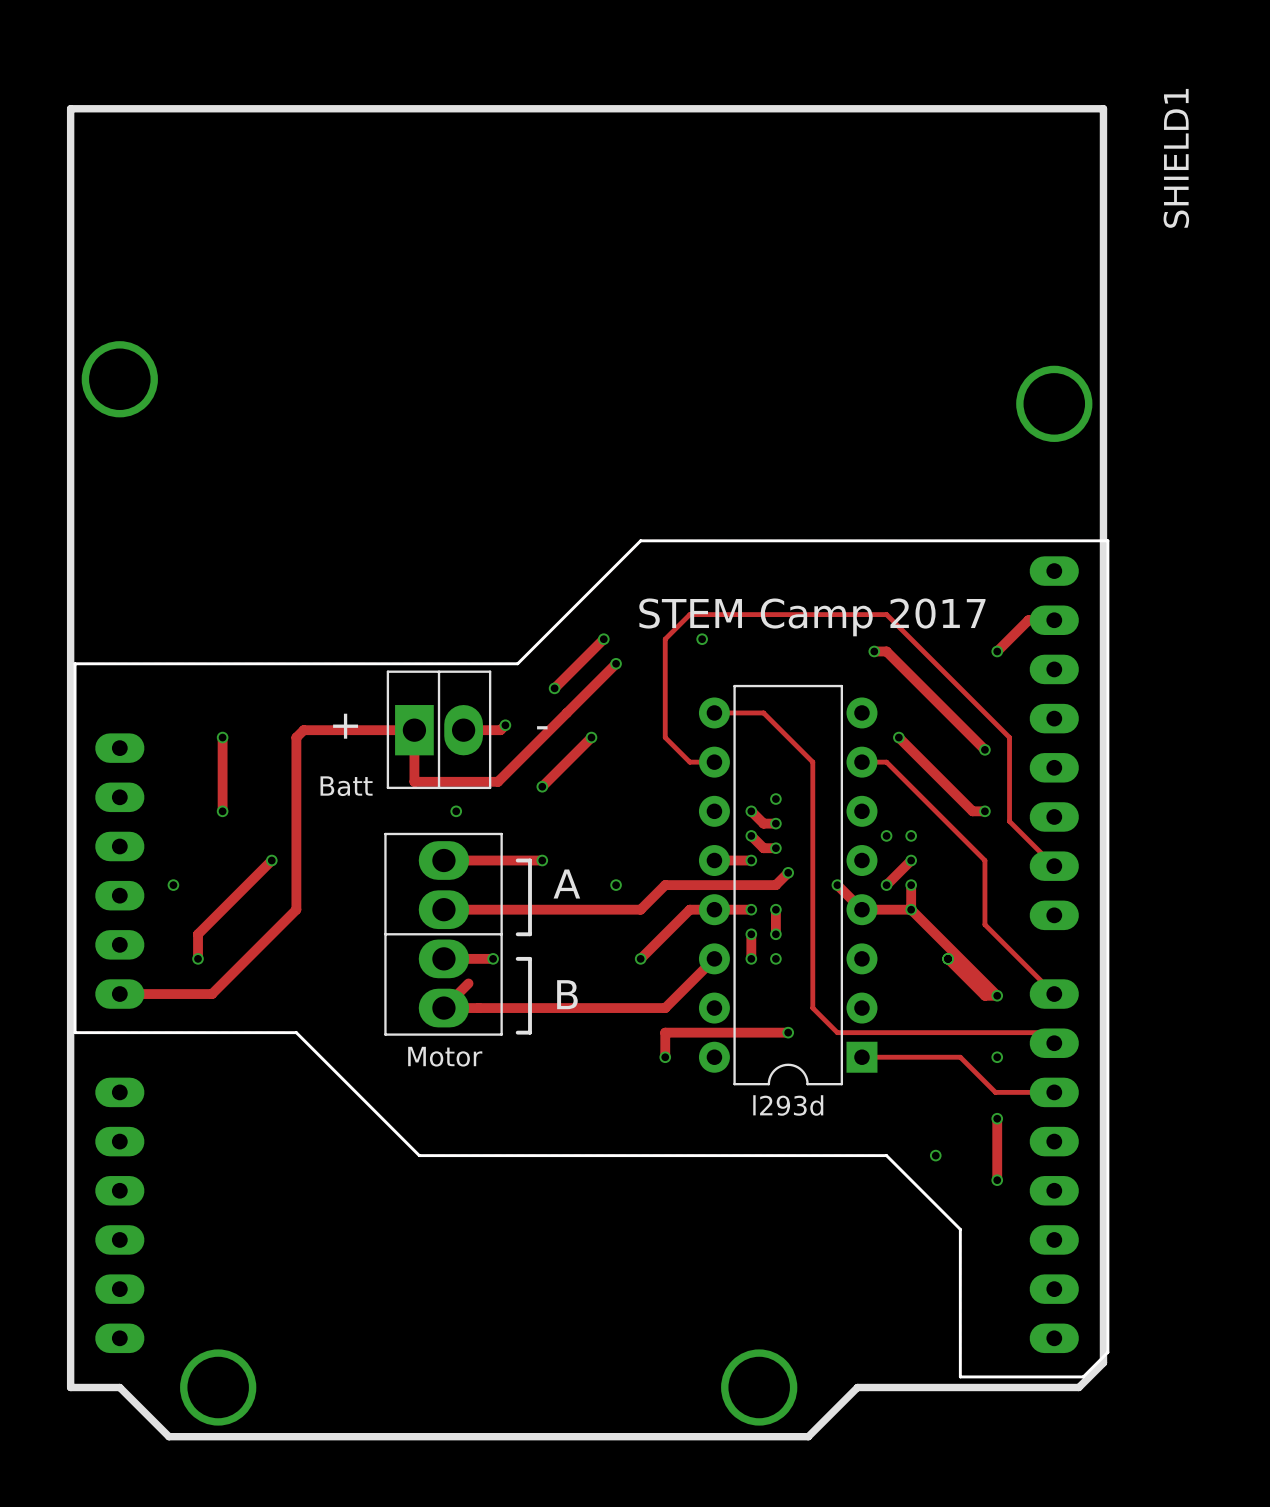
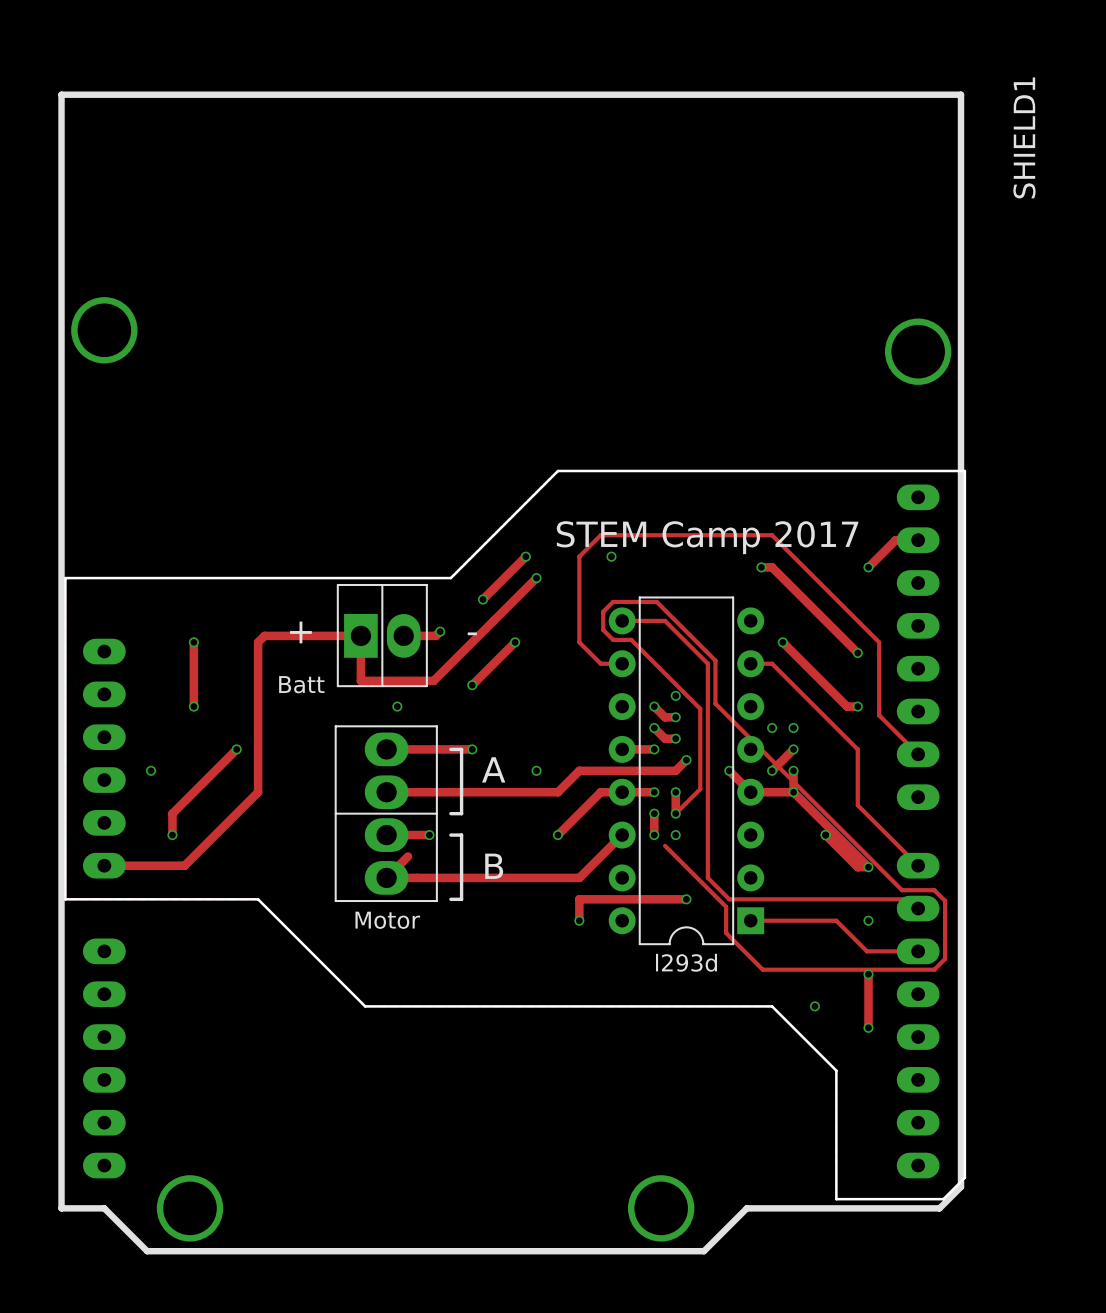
track: none -> (675, 813) (700, 789) (700, 708) (631, 639) (613, 639) (603, 630) (603, 611) (613, 601) (656, 601) (715, 660) (715, 703) (902, 890) (934, 890) (945, 900) (945, 958) (934, 969) (762, 969) (726, 933) (726, 906) (665, 845)

